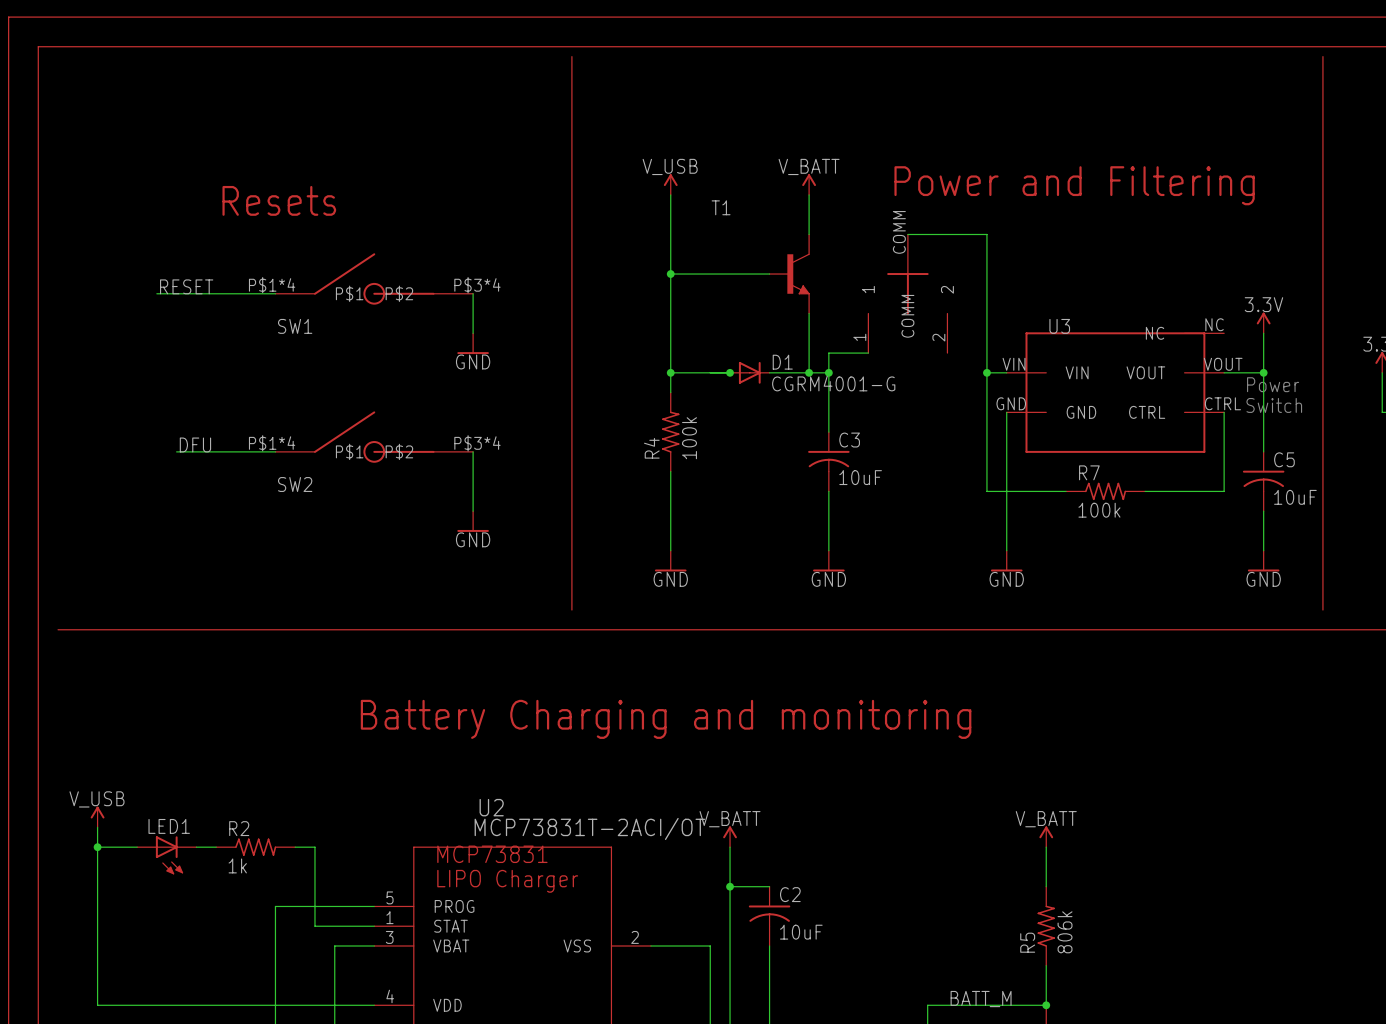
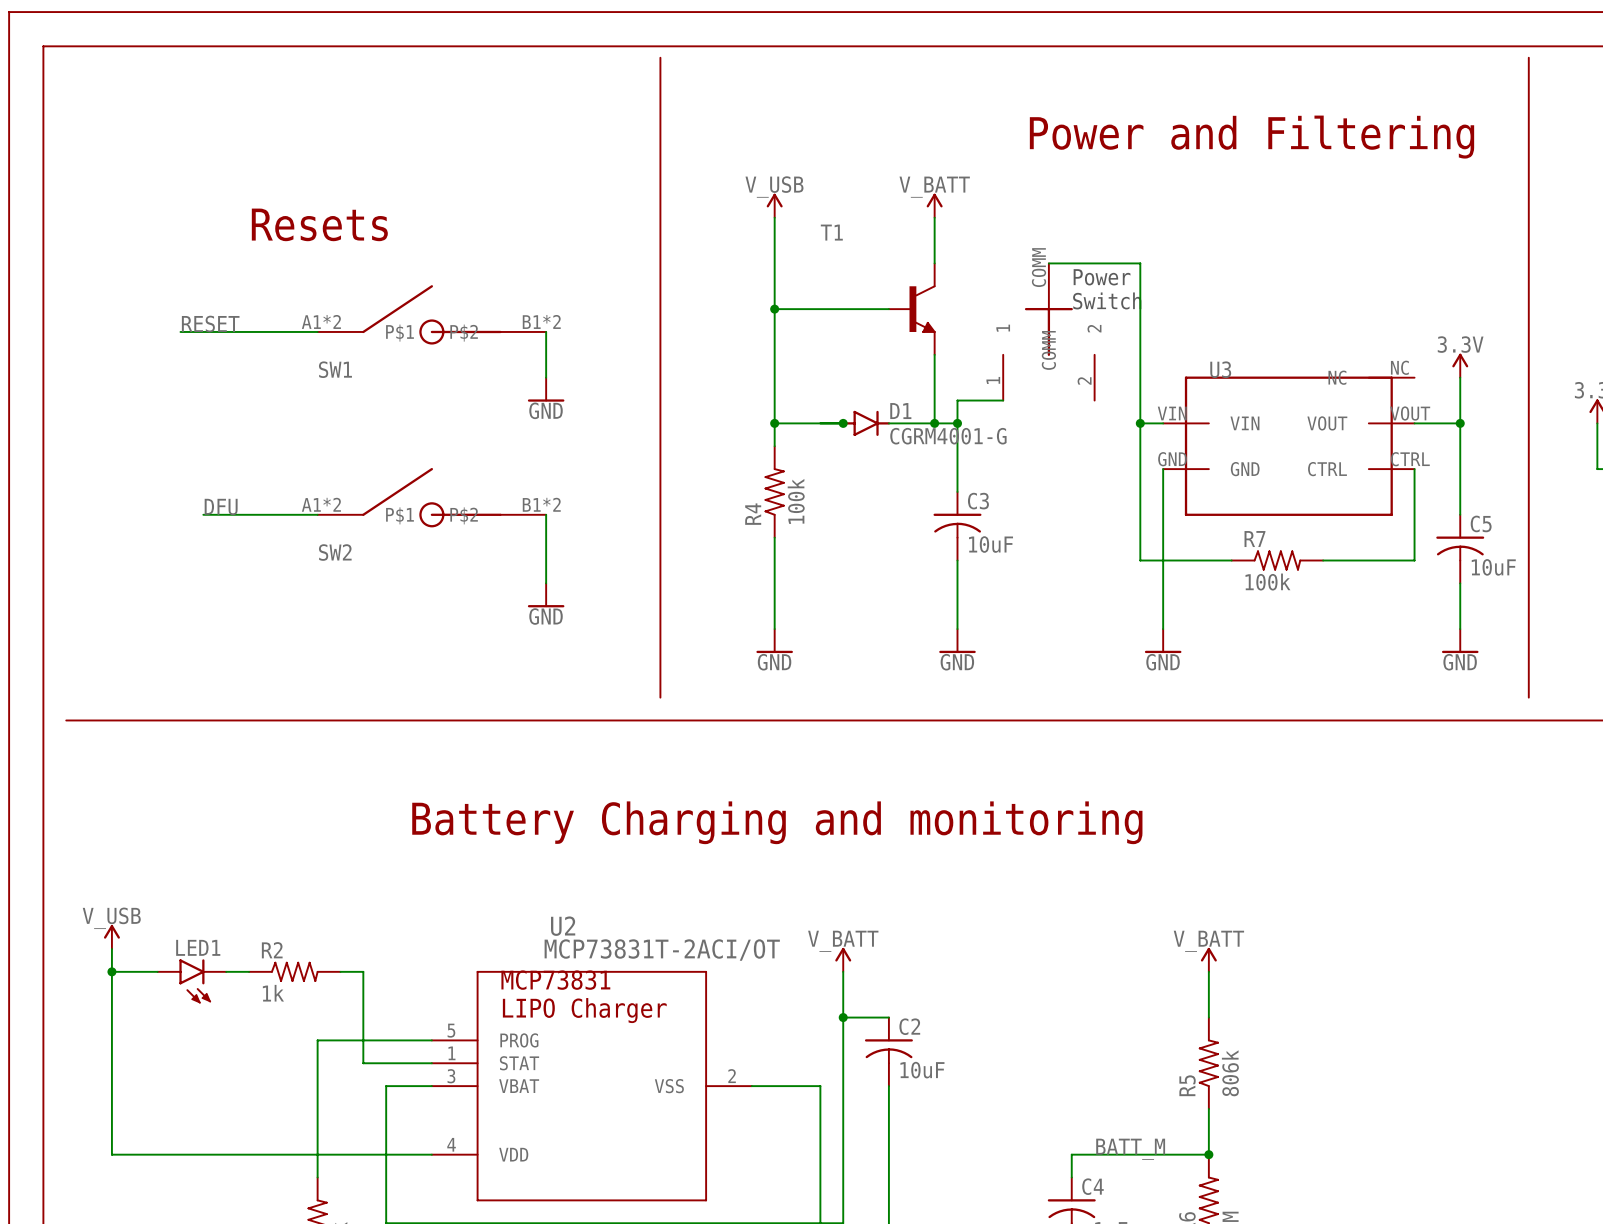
text position: Power and Filtering (1074, 185) -> Power and Filtering (1252, 137)
text: none -> Power (1102, 277)
text: none -> Switch (1107, 300)
SW1 pin number: P$1*4 (272, 285) -> A1*2 (321, 321)
SW1 pin number: P$3*4 (477, 285) -> B1*2 (541, 321)
D1 symbol: [730, 361, 770, 384] -> [842, 410, 891, 436]
text: Power (1273, 384) -> none
text: Switch (1274, 405) -> none
SW2 pin number: P$1*4 (272, 443) -> A1*2 (321, 504)
SW2 pin number: P$3*4 (477, 443) -> B1*2 (541, 504)
LED1 symbol: [137, 836, 197, 875] -> [157, 959, 227, 1004]

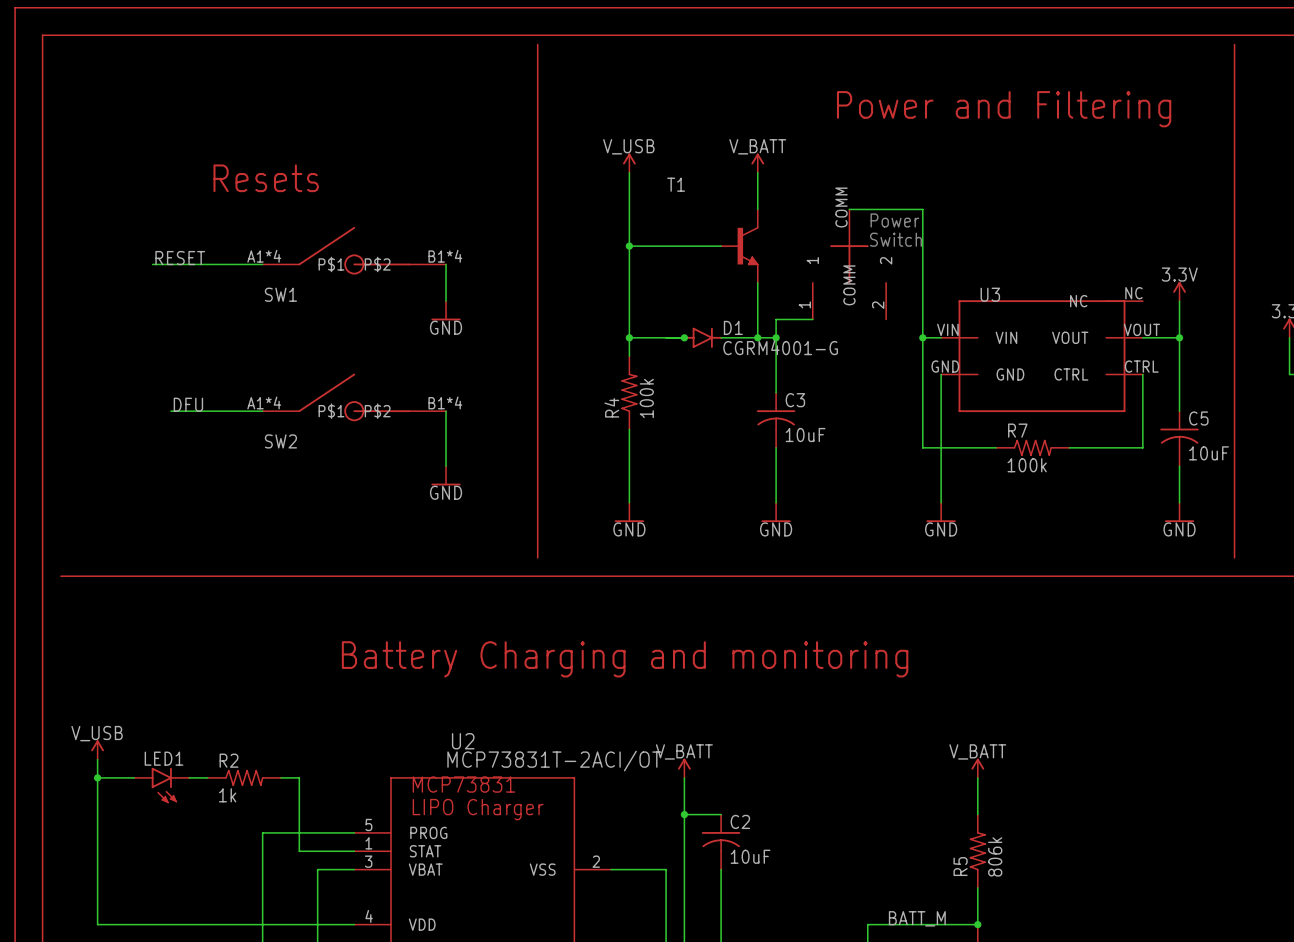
SW1 pin number: A1*2 (321, 321) -> A1*4 (264, 256)
SW1 pin number: B1*2 (541, 321) -> B1*4 (445, 256)
SW2 pin number: A1*2 (321, 504) -> A1*4 (264, 402)
SW2 pin number: B1*2 (541, 504) -> B1*4 (445, 402)

